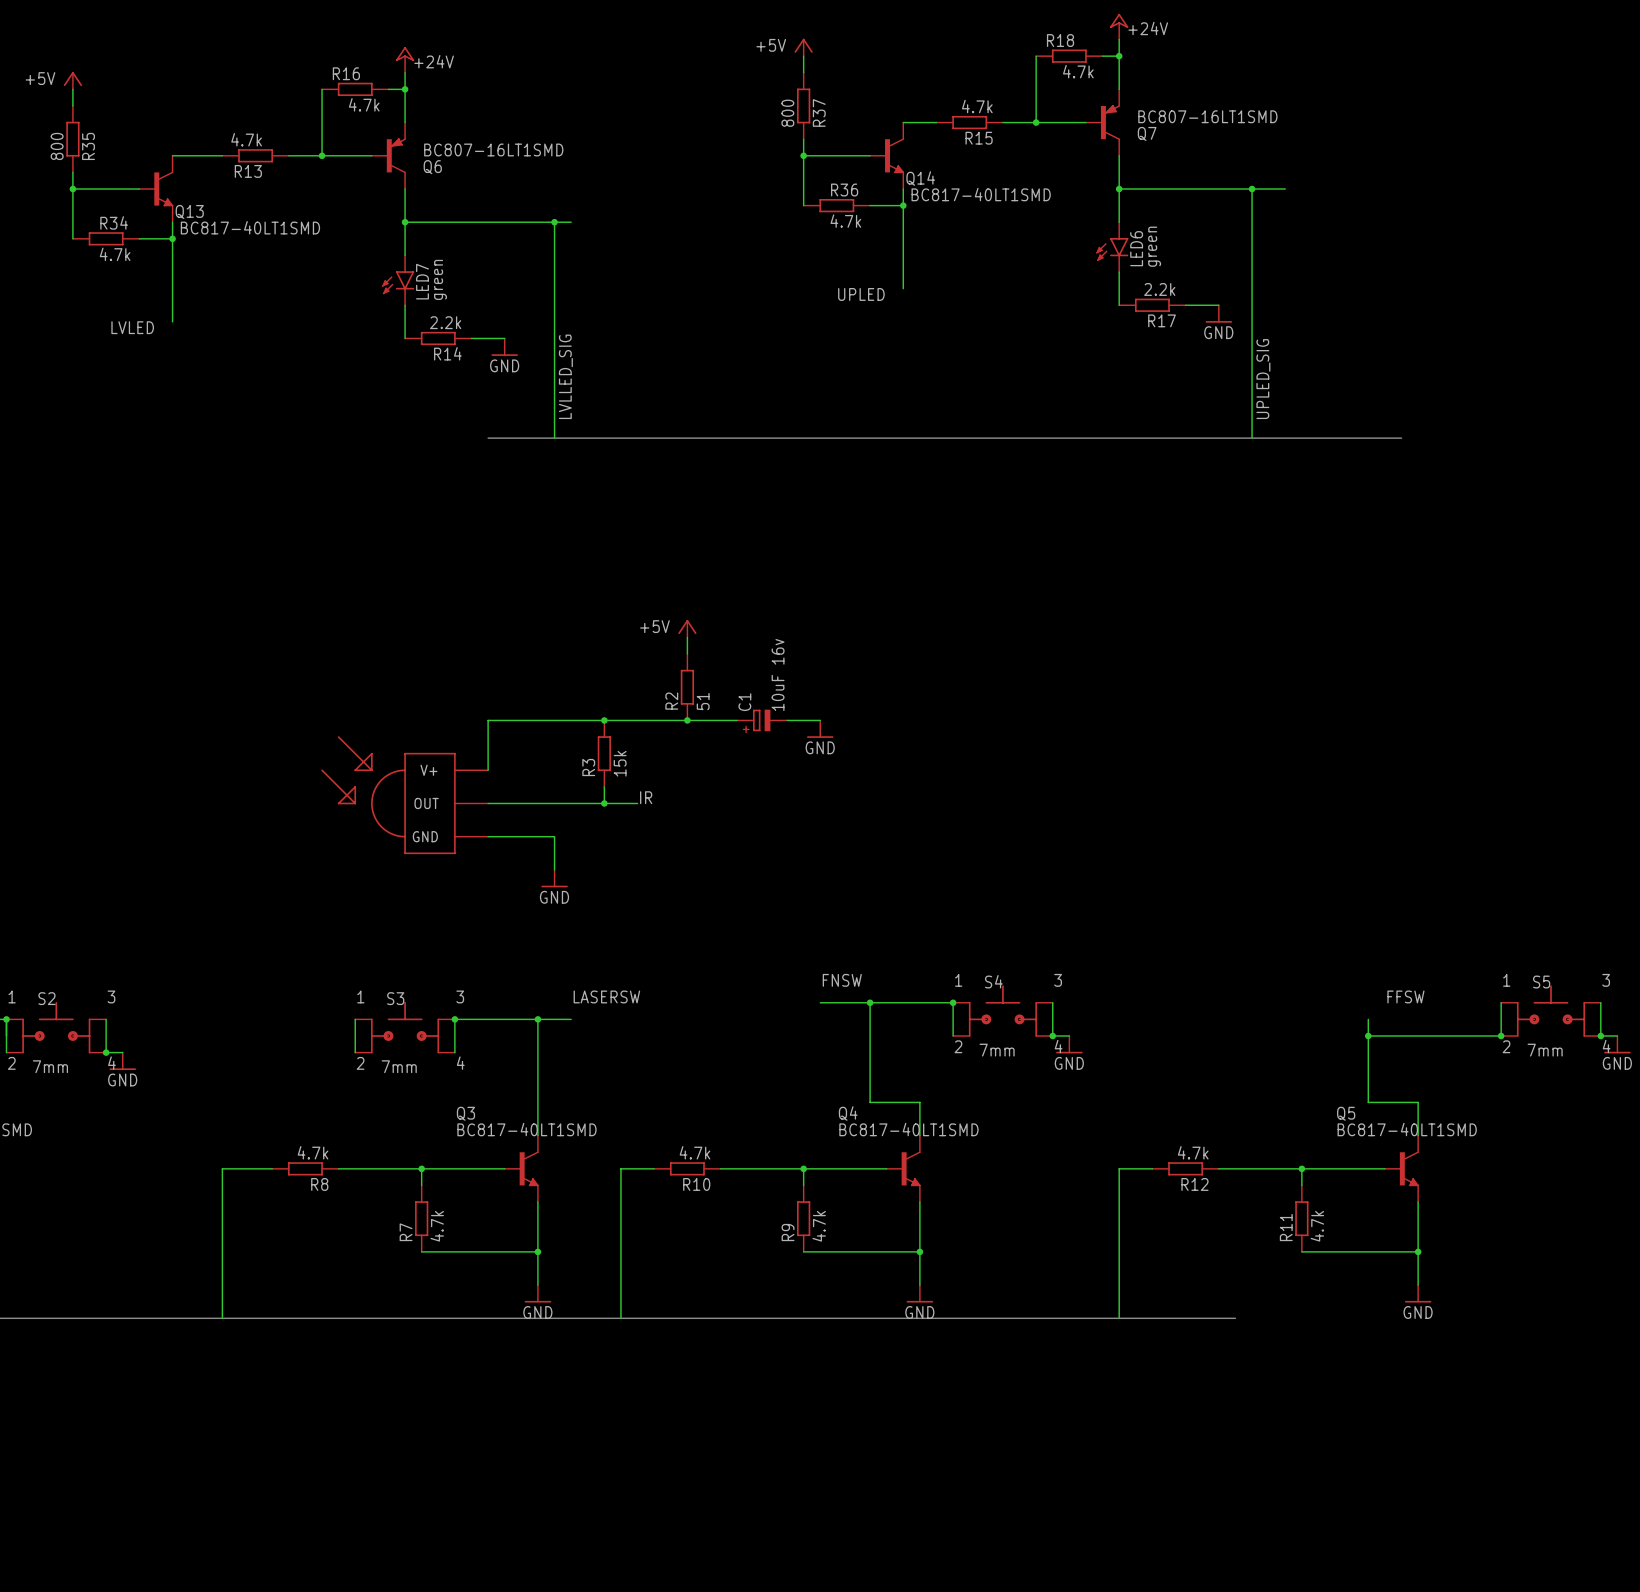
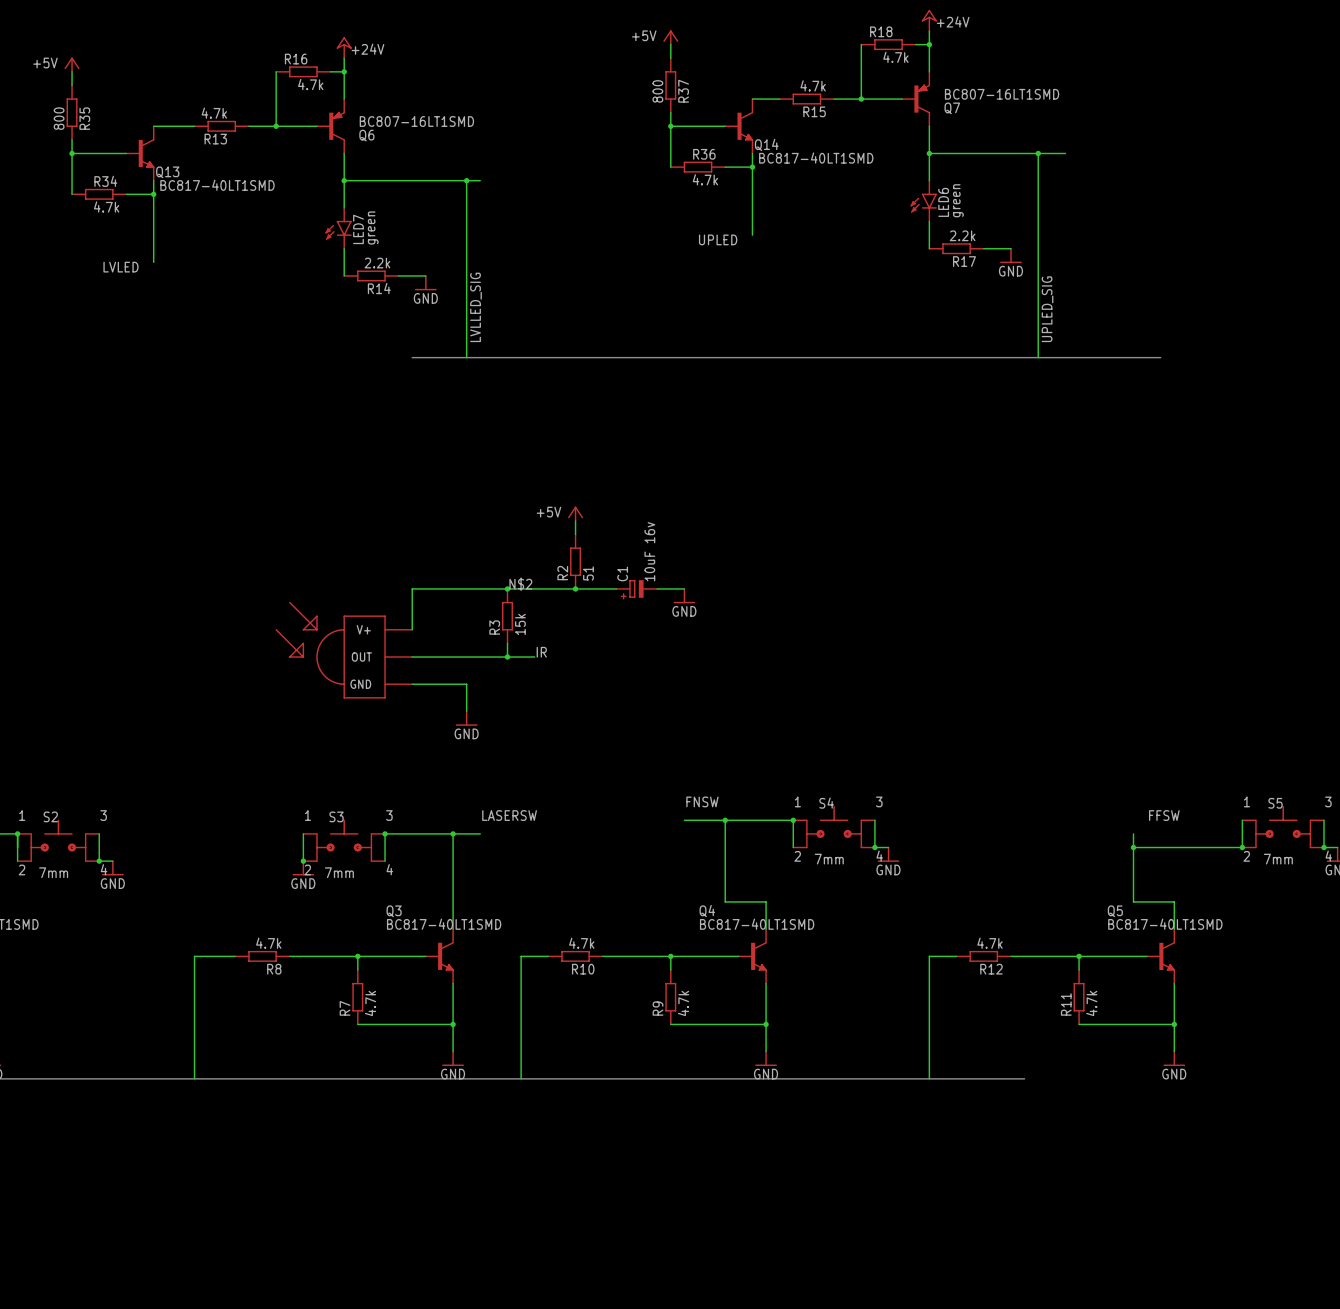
label: none -> N$2 (520, 584)
junction: none -> (303, 861)
power symbol: none -> GND (303, 868)

